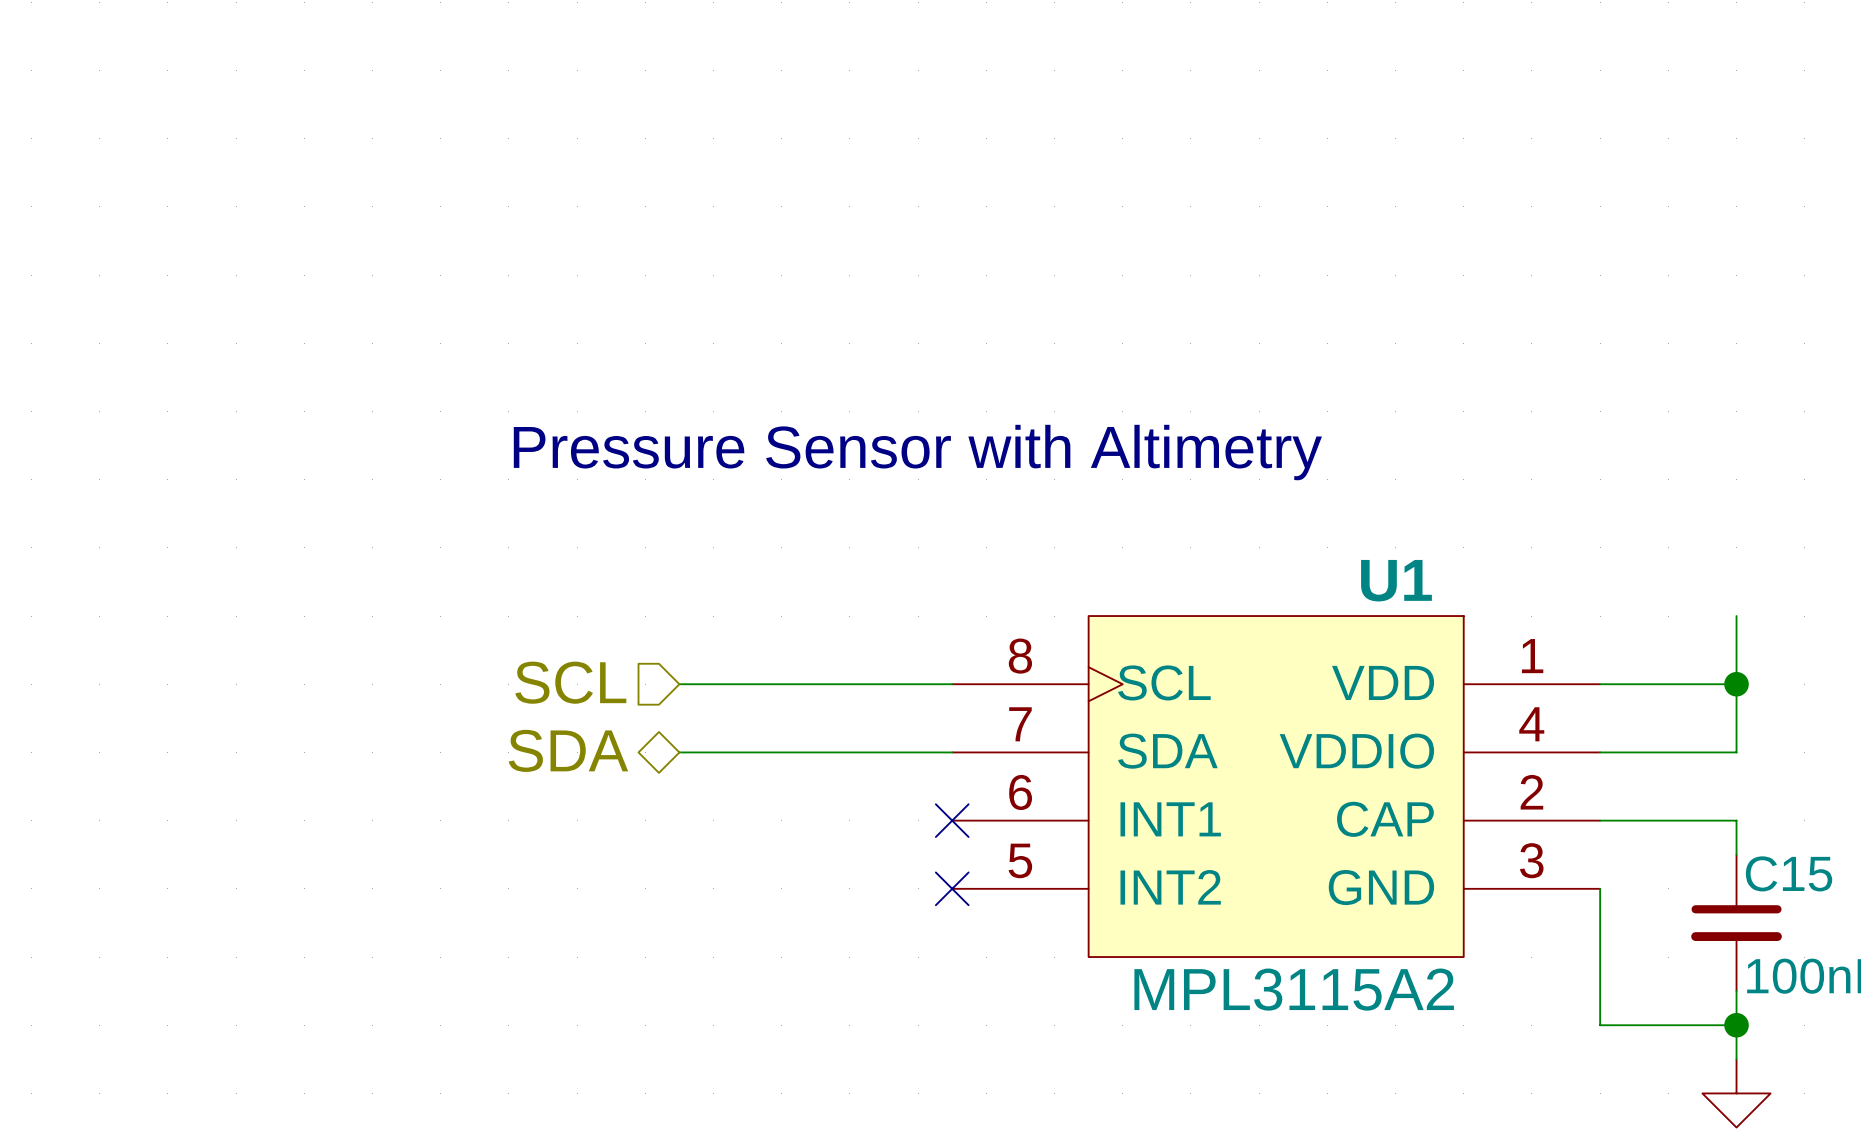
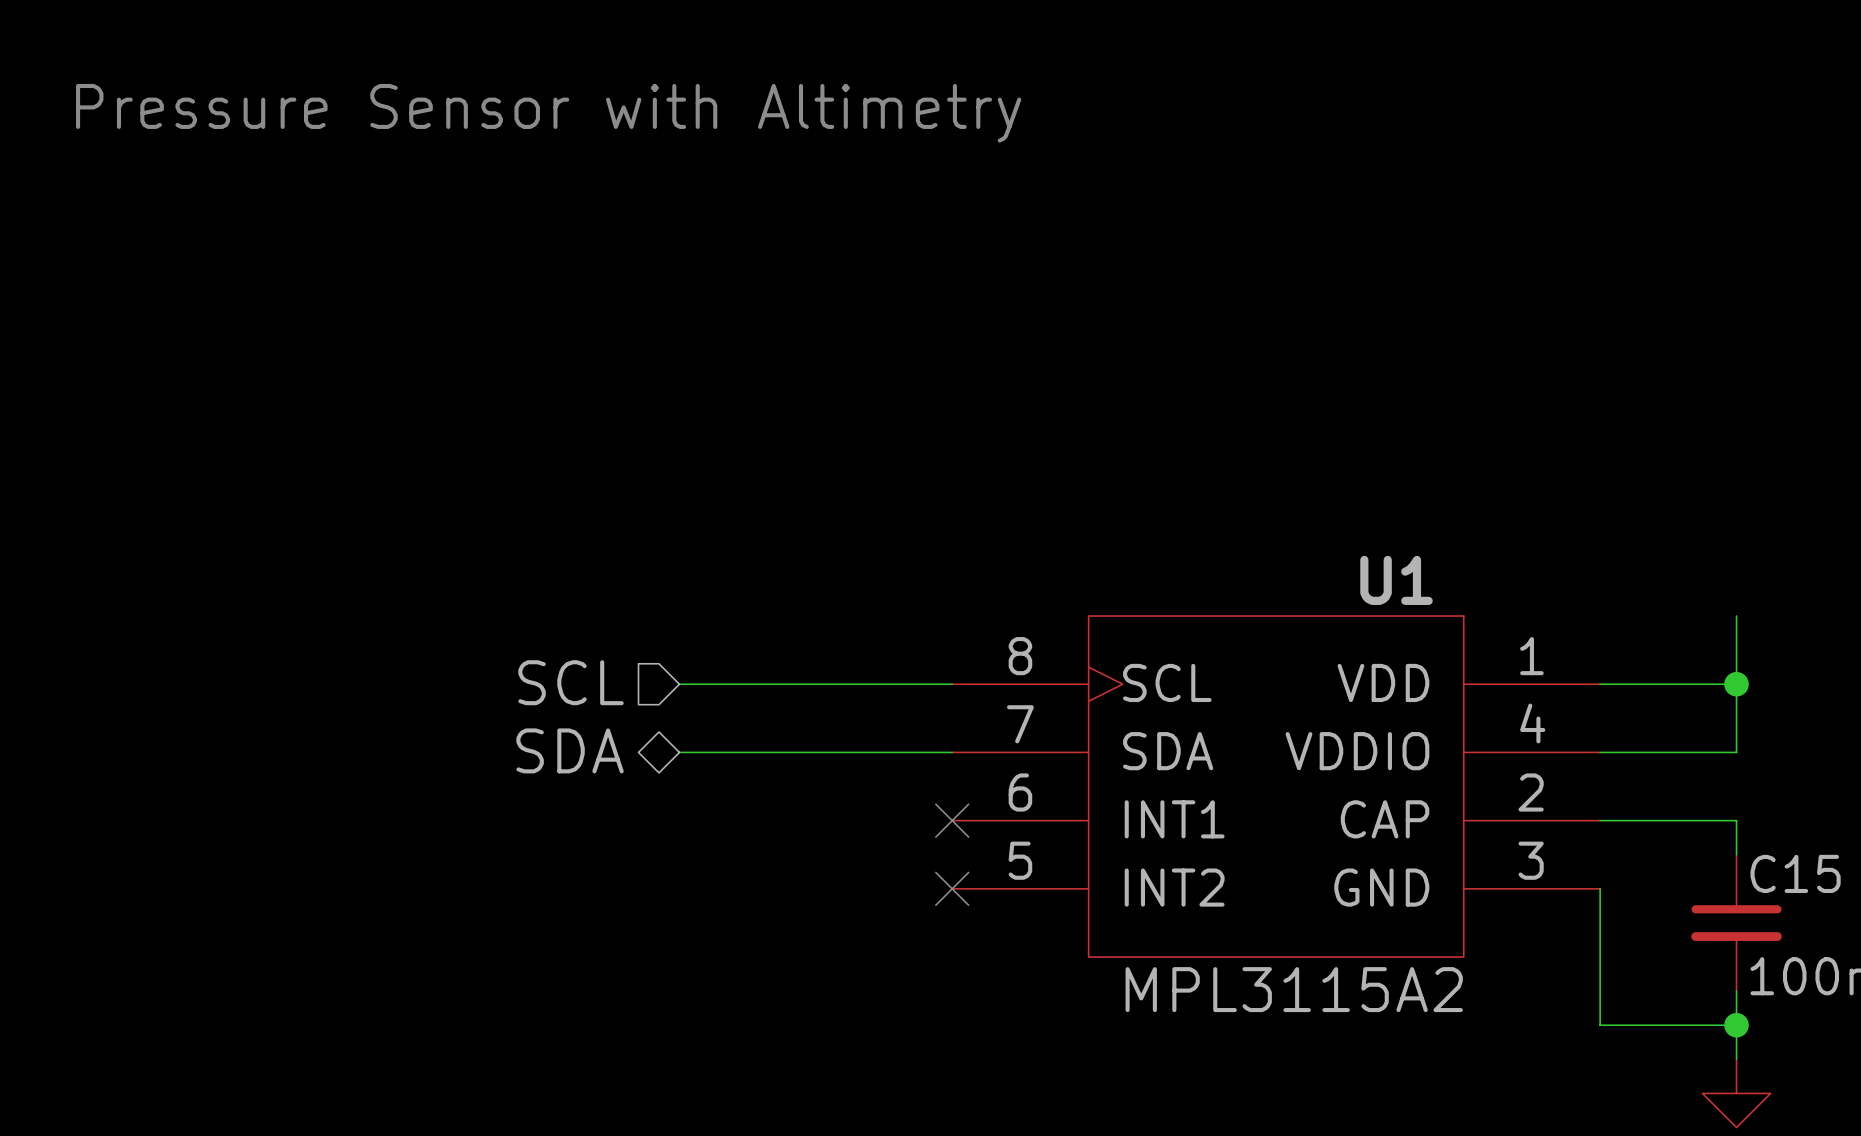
text position: Pressure Sensor with Altimetry (917, 452) -> Pressure Sensor with Altimetry (548, 113)

